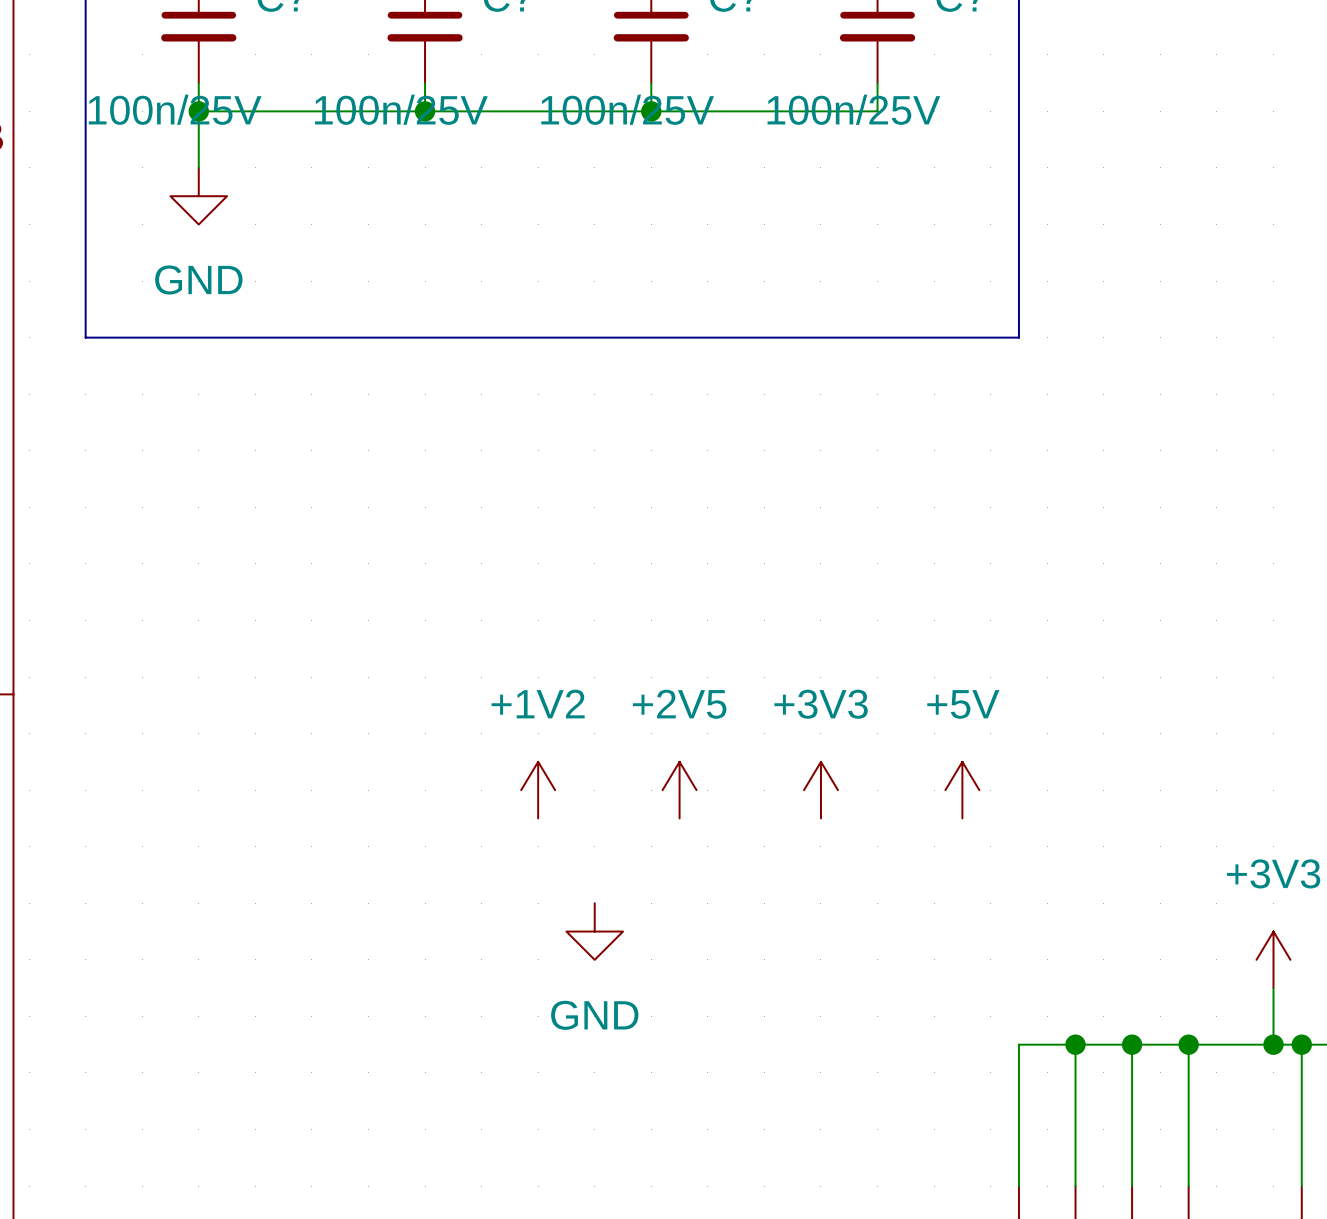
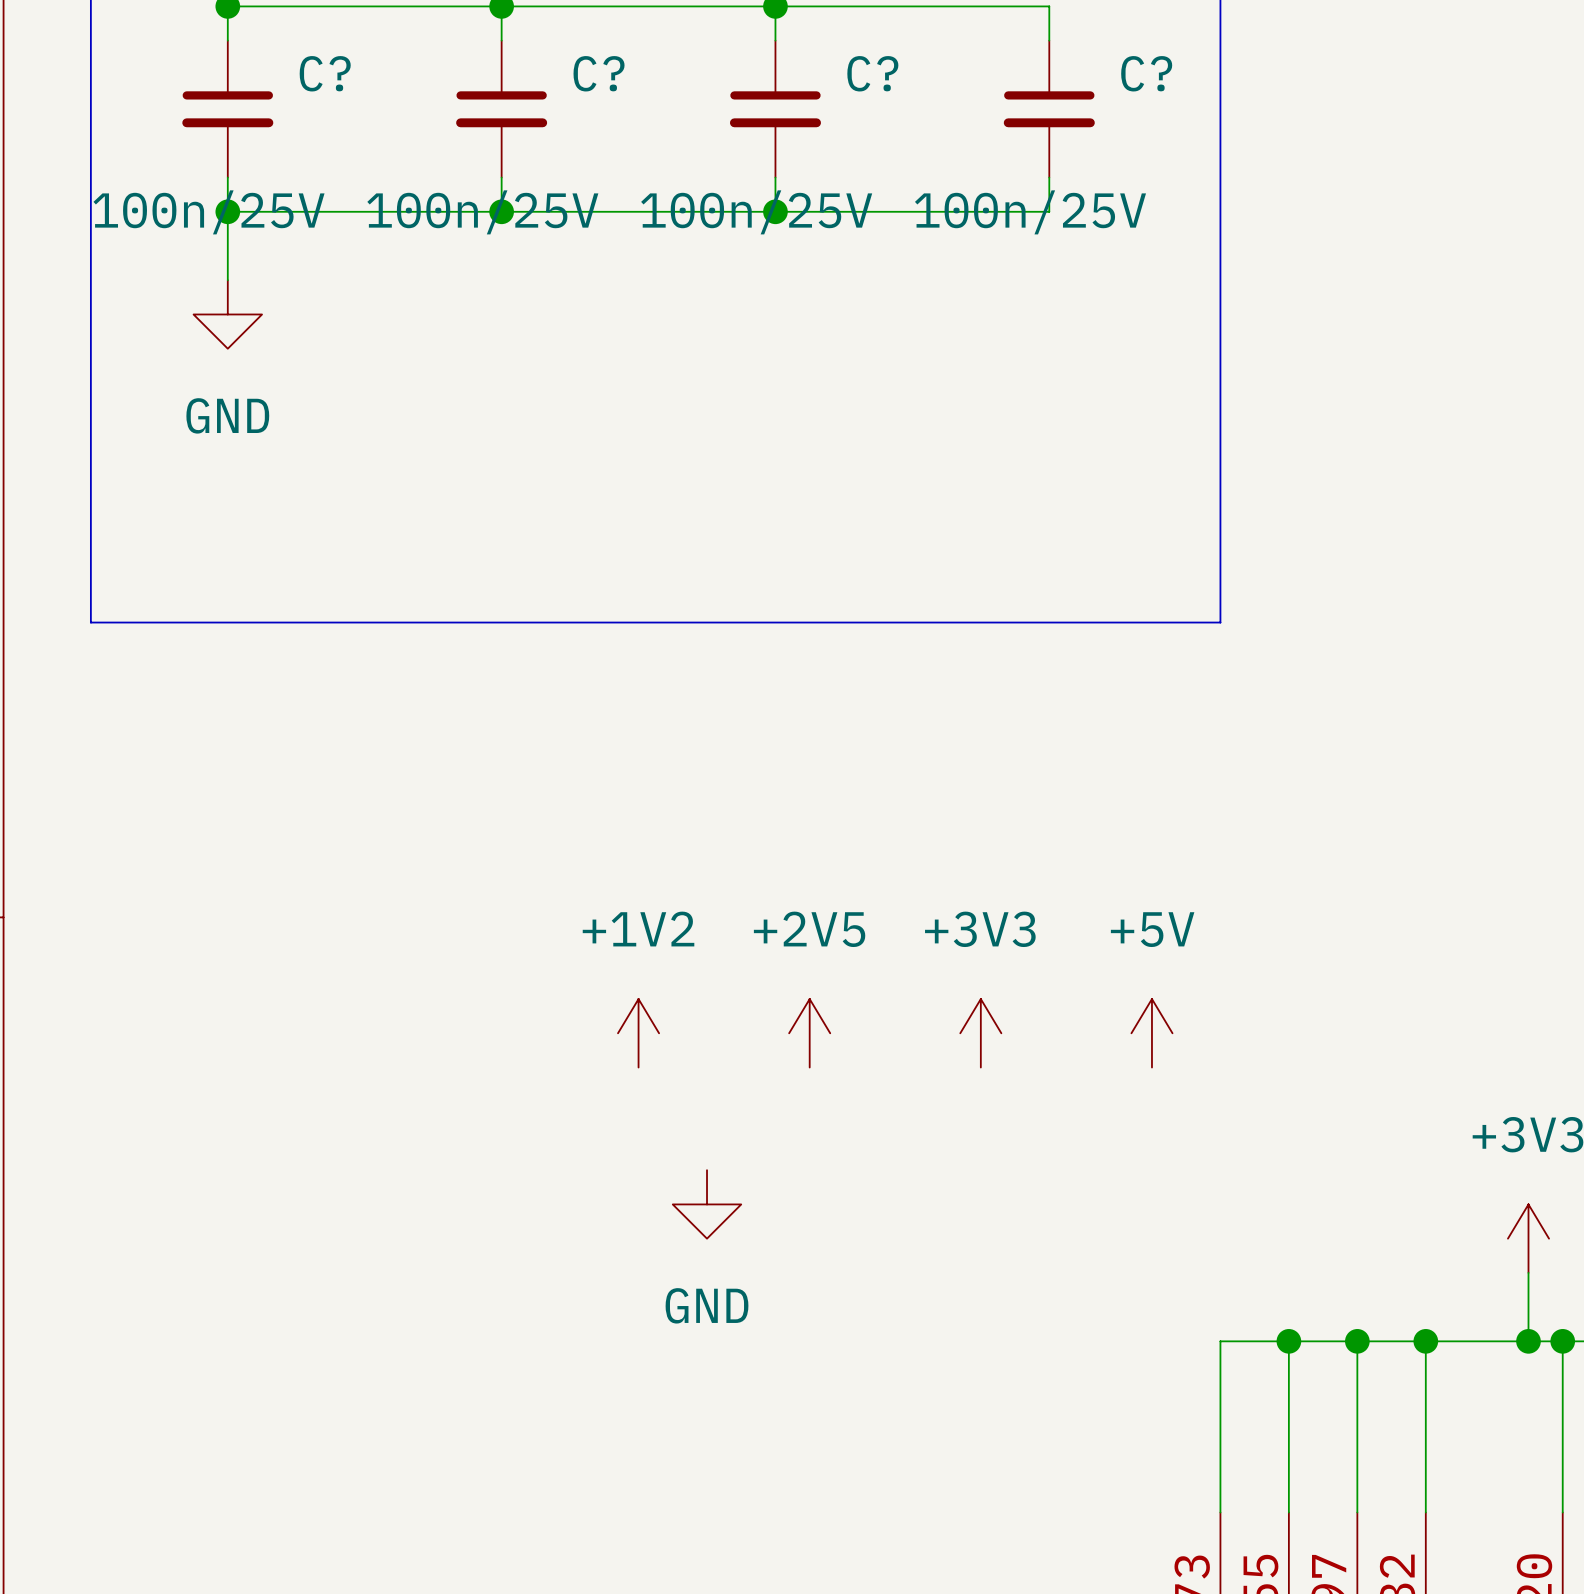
line: (85, 337) (1018, 337) -> (90, 485) (90, 622) (1220, 622) (1220, 485)

